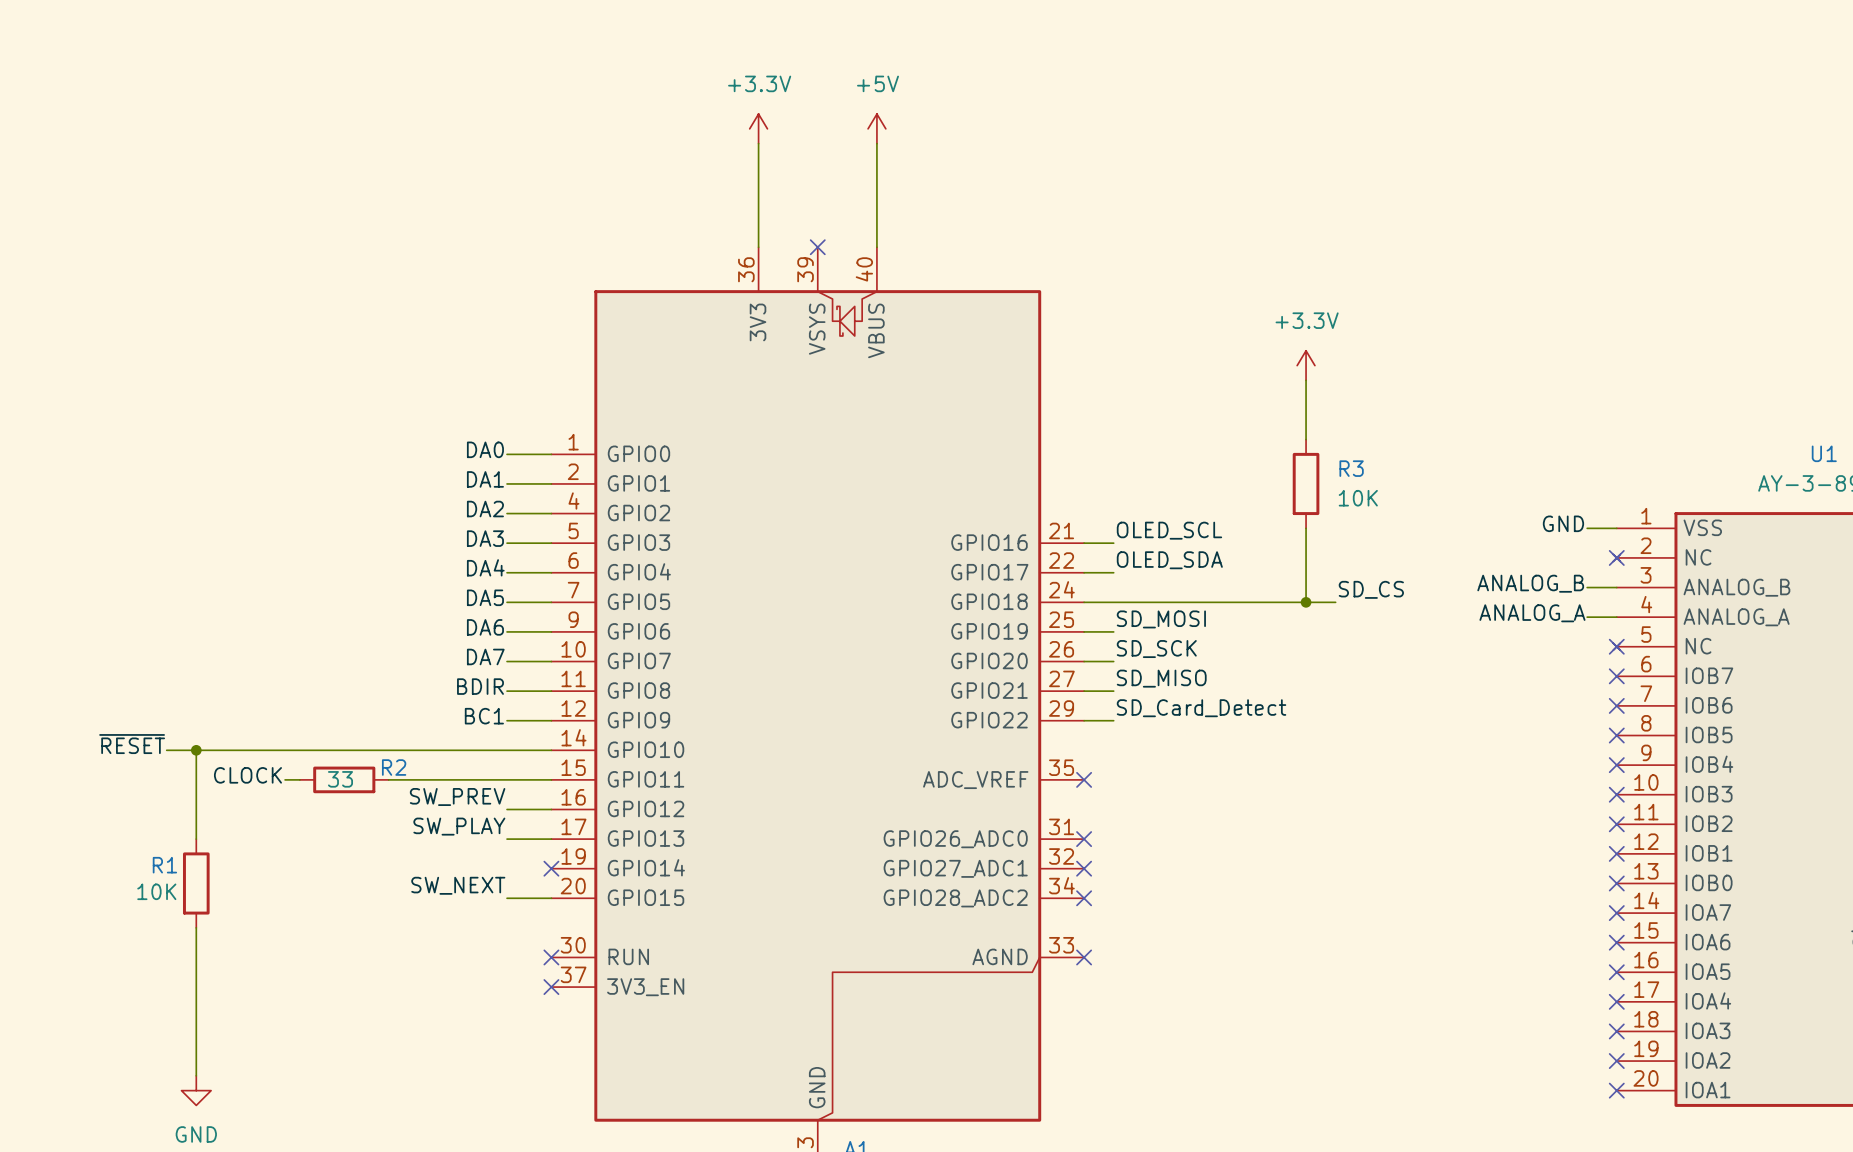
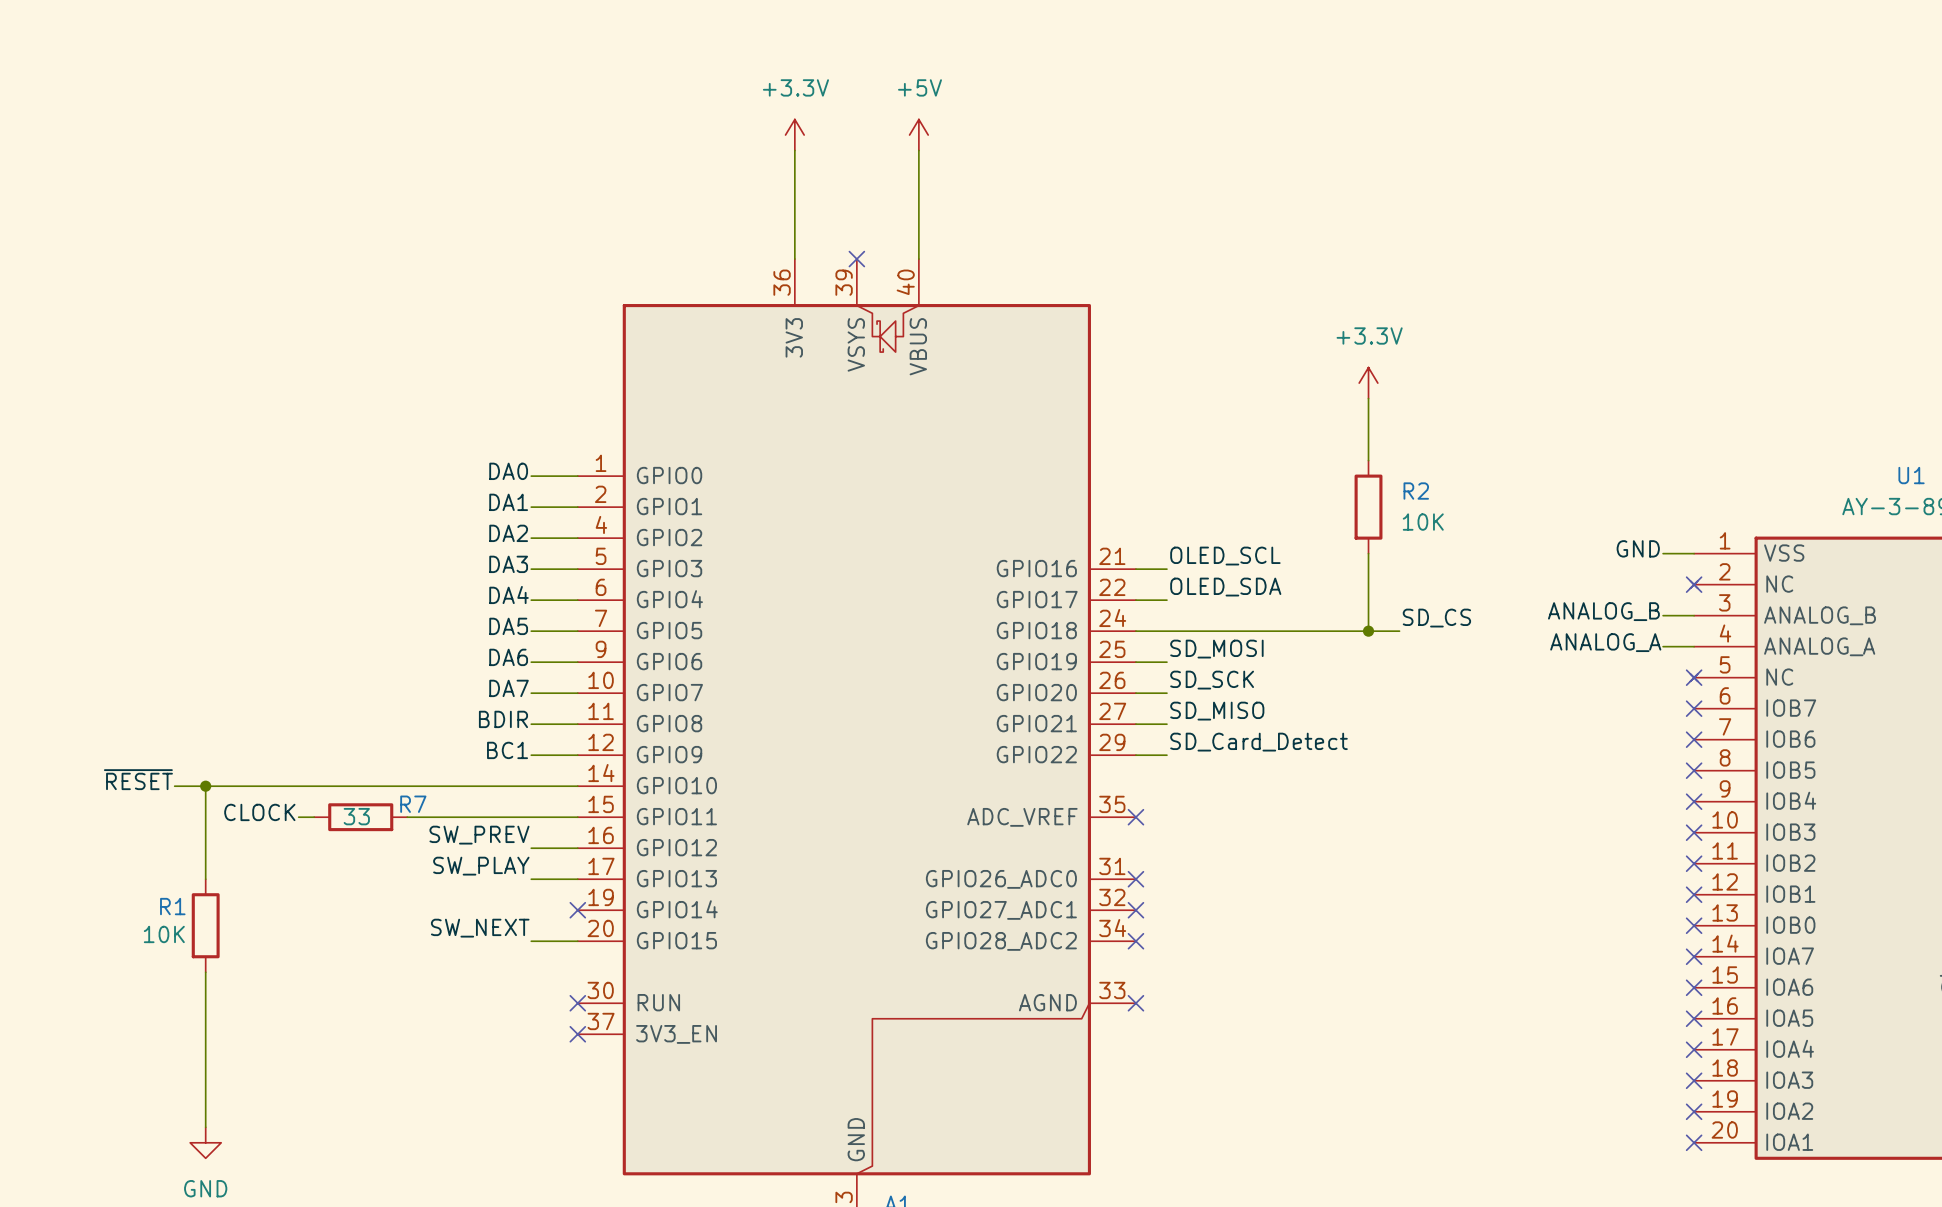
R3 name: R3 (1351, 468) -> R2 (1416, 491)
R2 name: R2 (394, 767) -> R7 (413, 804)

